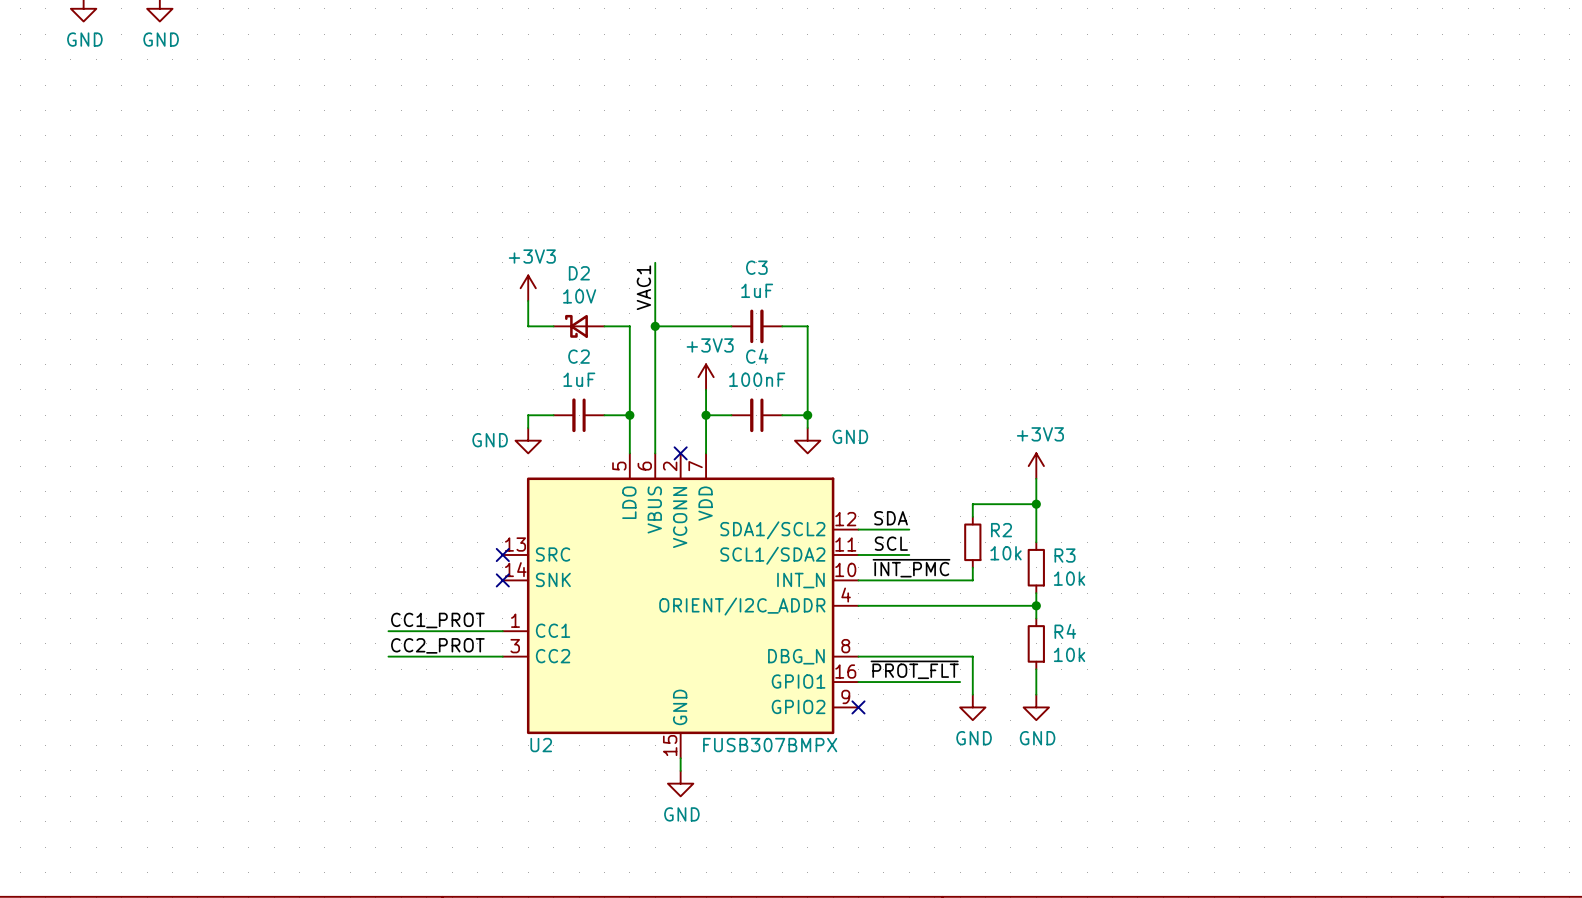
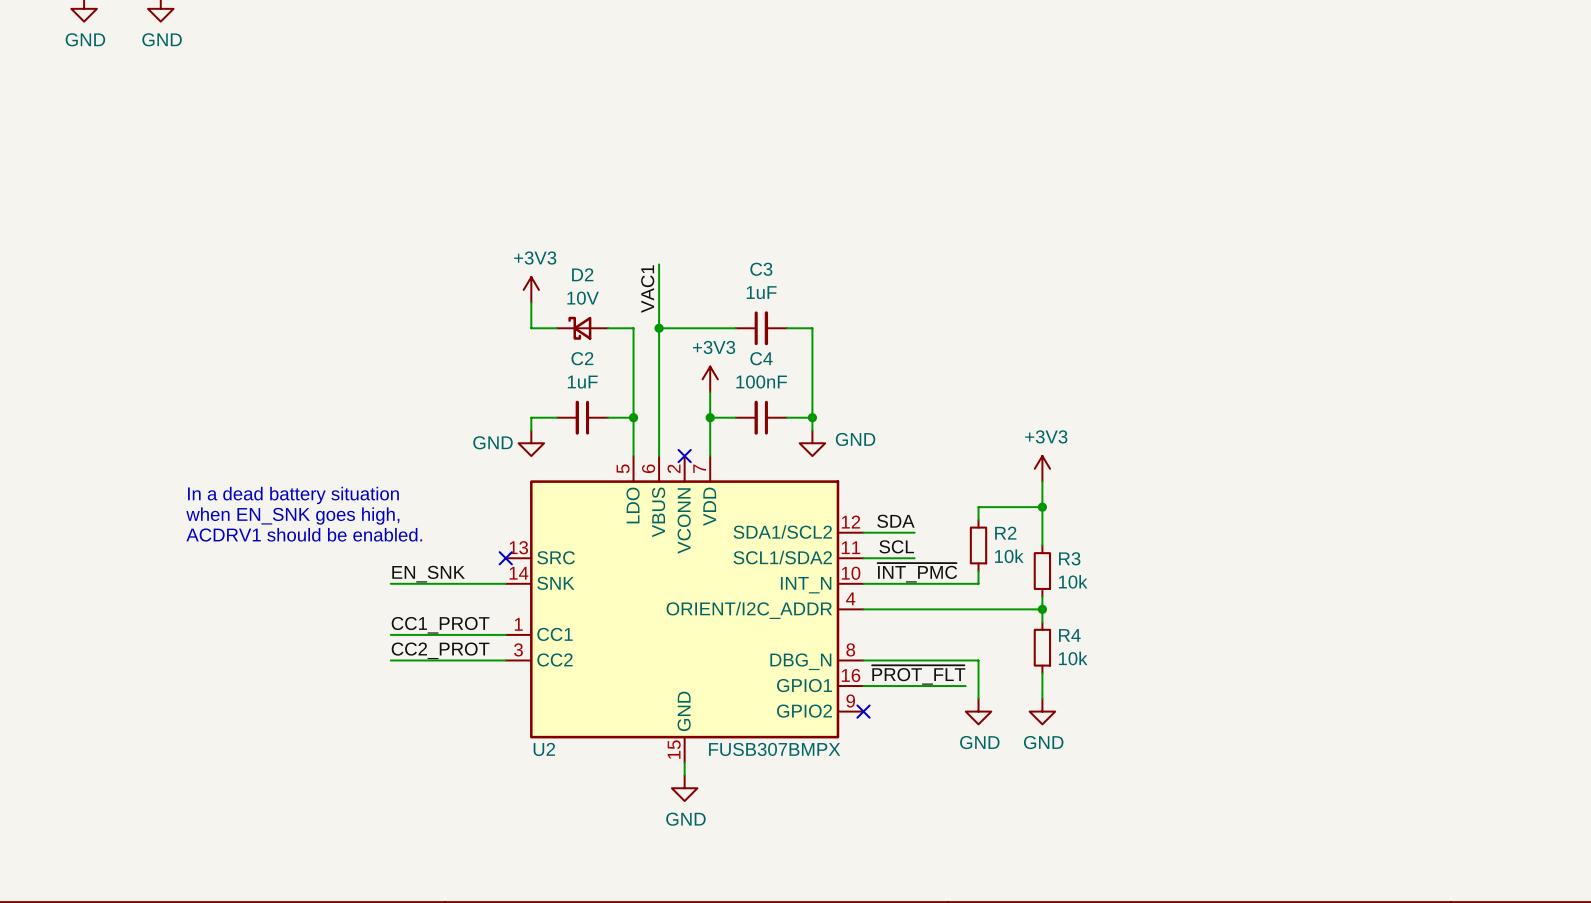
text: none -> In a dead battery situation (293, 495)
text: none -> when EN_SNK goes high, (292, 516)
text: none -> ACDRV1 should be enabled. (304, 534)
label: none -> EN_SNK (428, 574)
wire: none -> (390, 583) (505, 583)
no-connect mark: (502, 580) -> none

